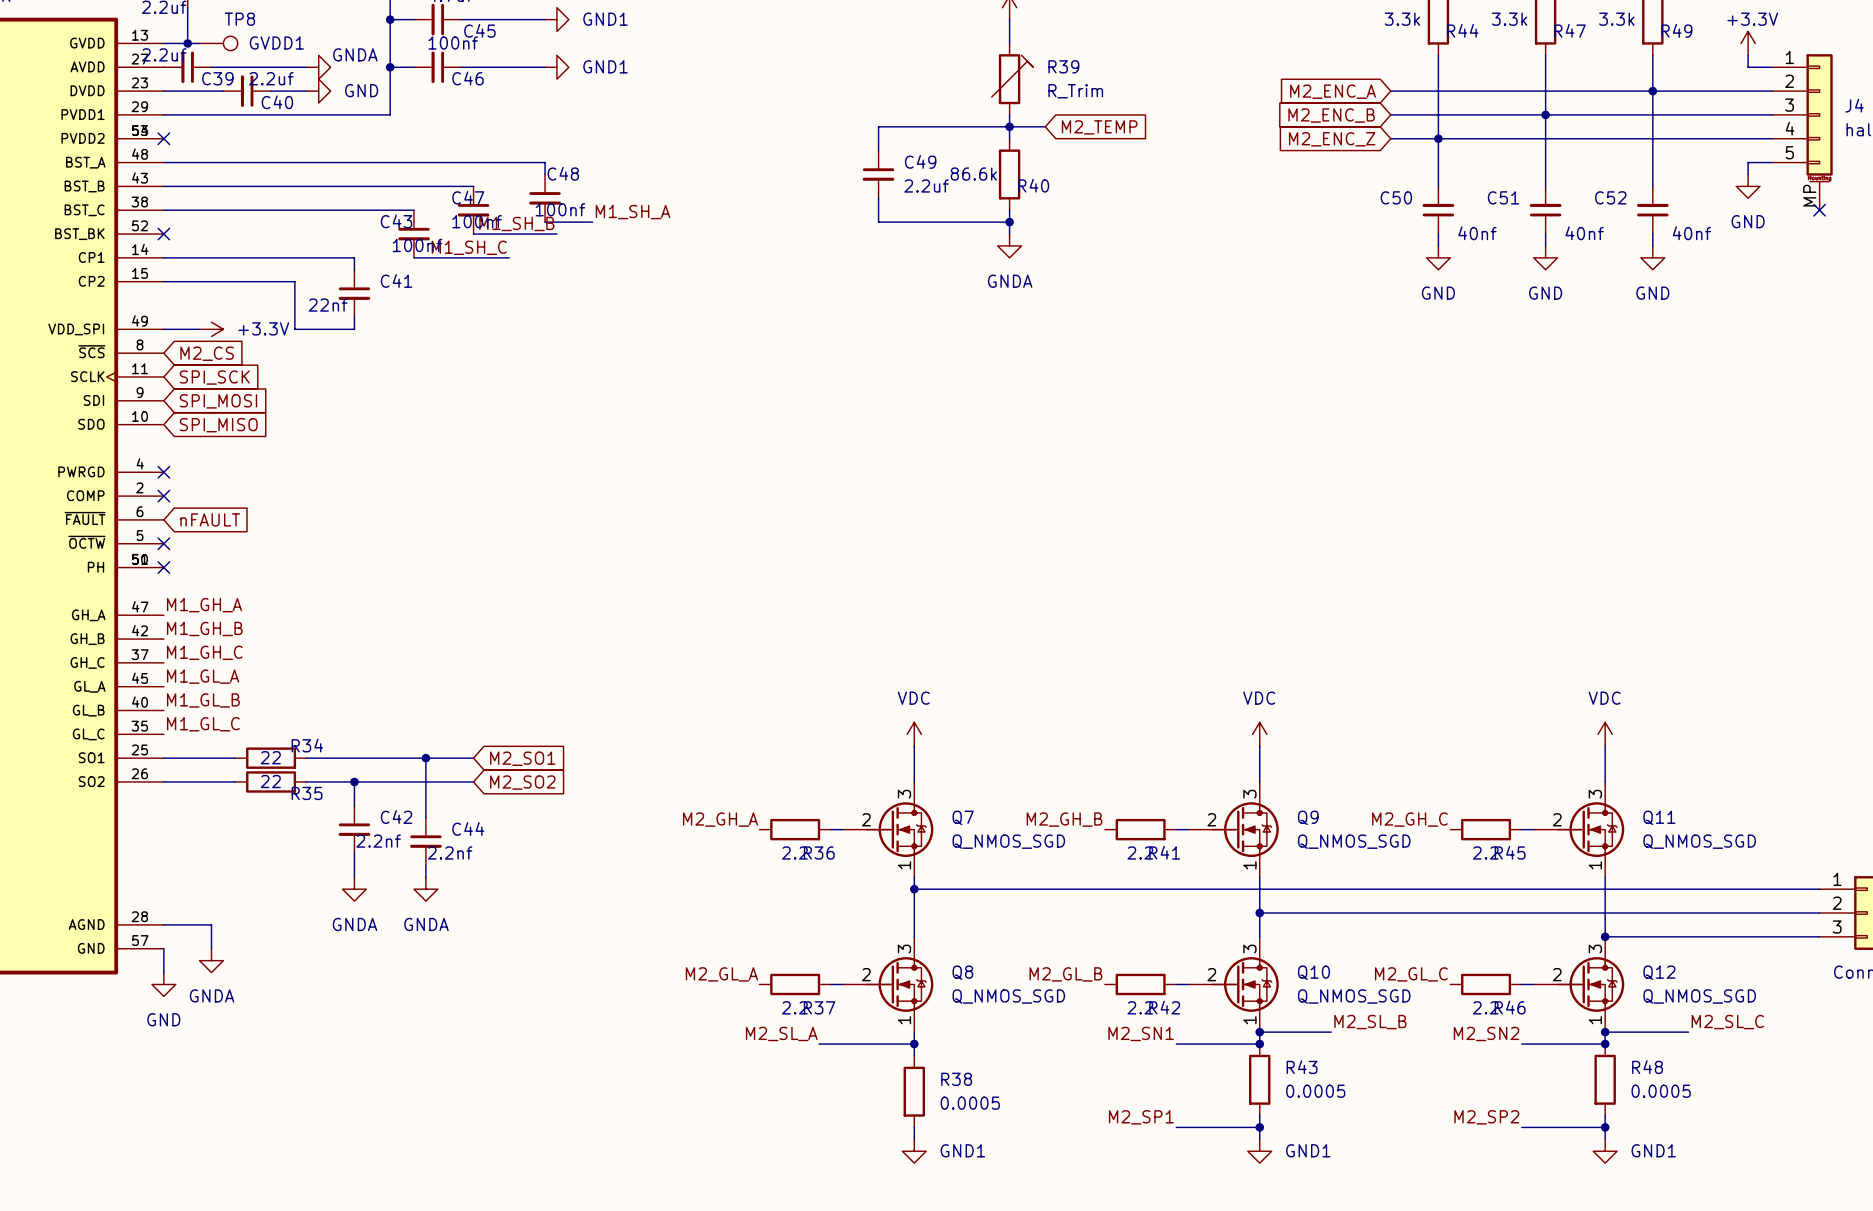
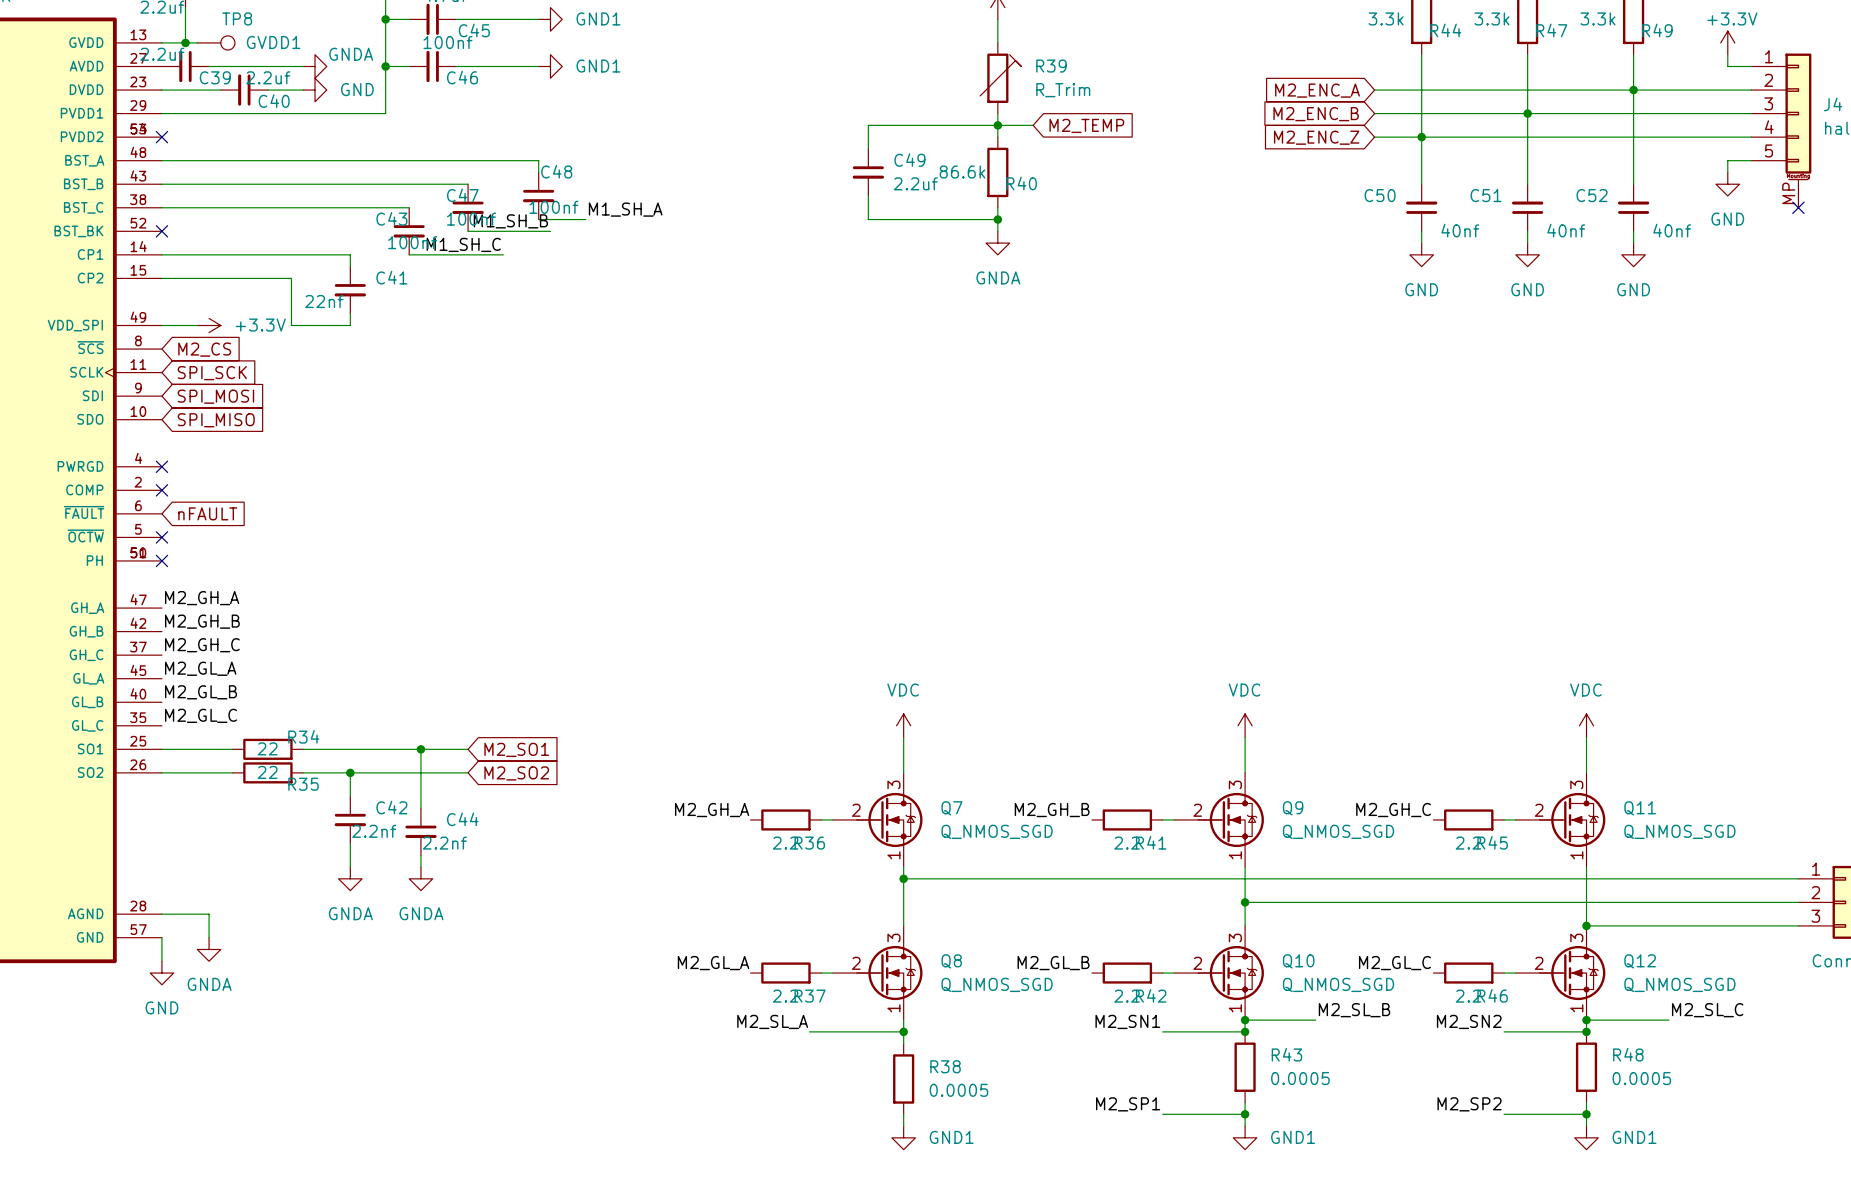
label: M1_GH_A (204, 605) -> M2_GH_A (202, 598)
label: M1_GH_B (204, 628) -> M2_GH_B (202, 621)
label: M1_GH_C (204, 652) -> M2_GH_C (202, 645)
label: M1_GL_A (203, 676) -> M2_GL_A (200, 668)
label: M1_GL_B (203, 700) -> M2_GL_B (201, 692)
label: M1_GL_C (203, 724) -> M2_GL_C (201, 715)

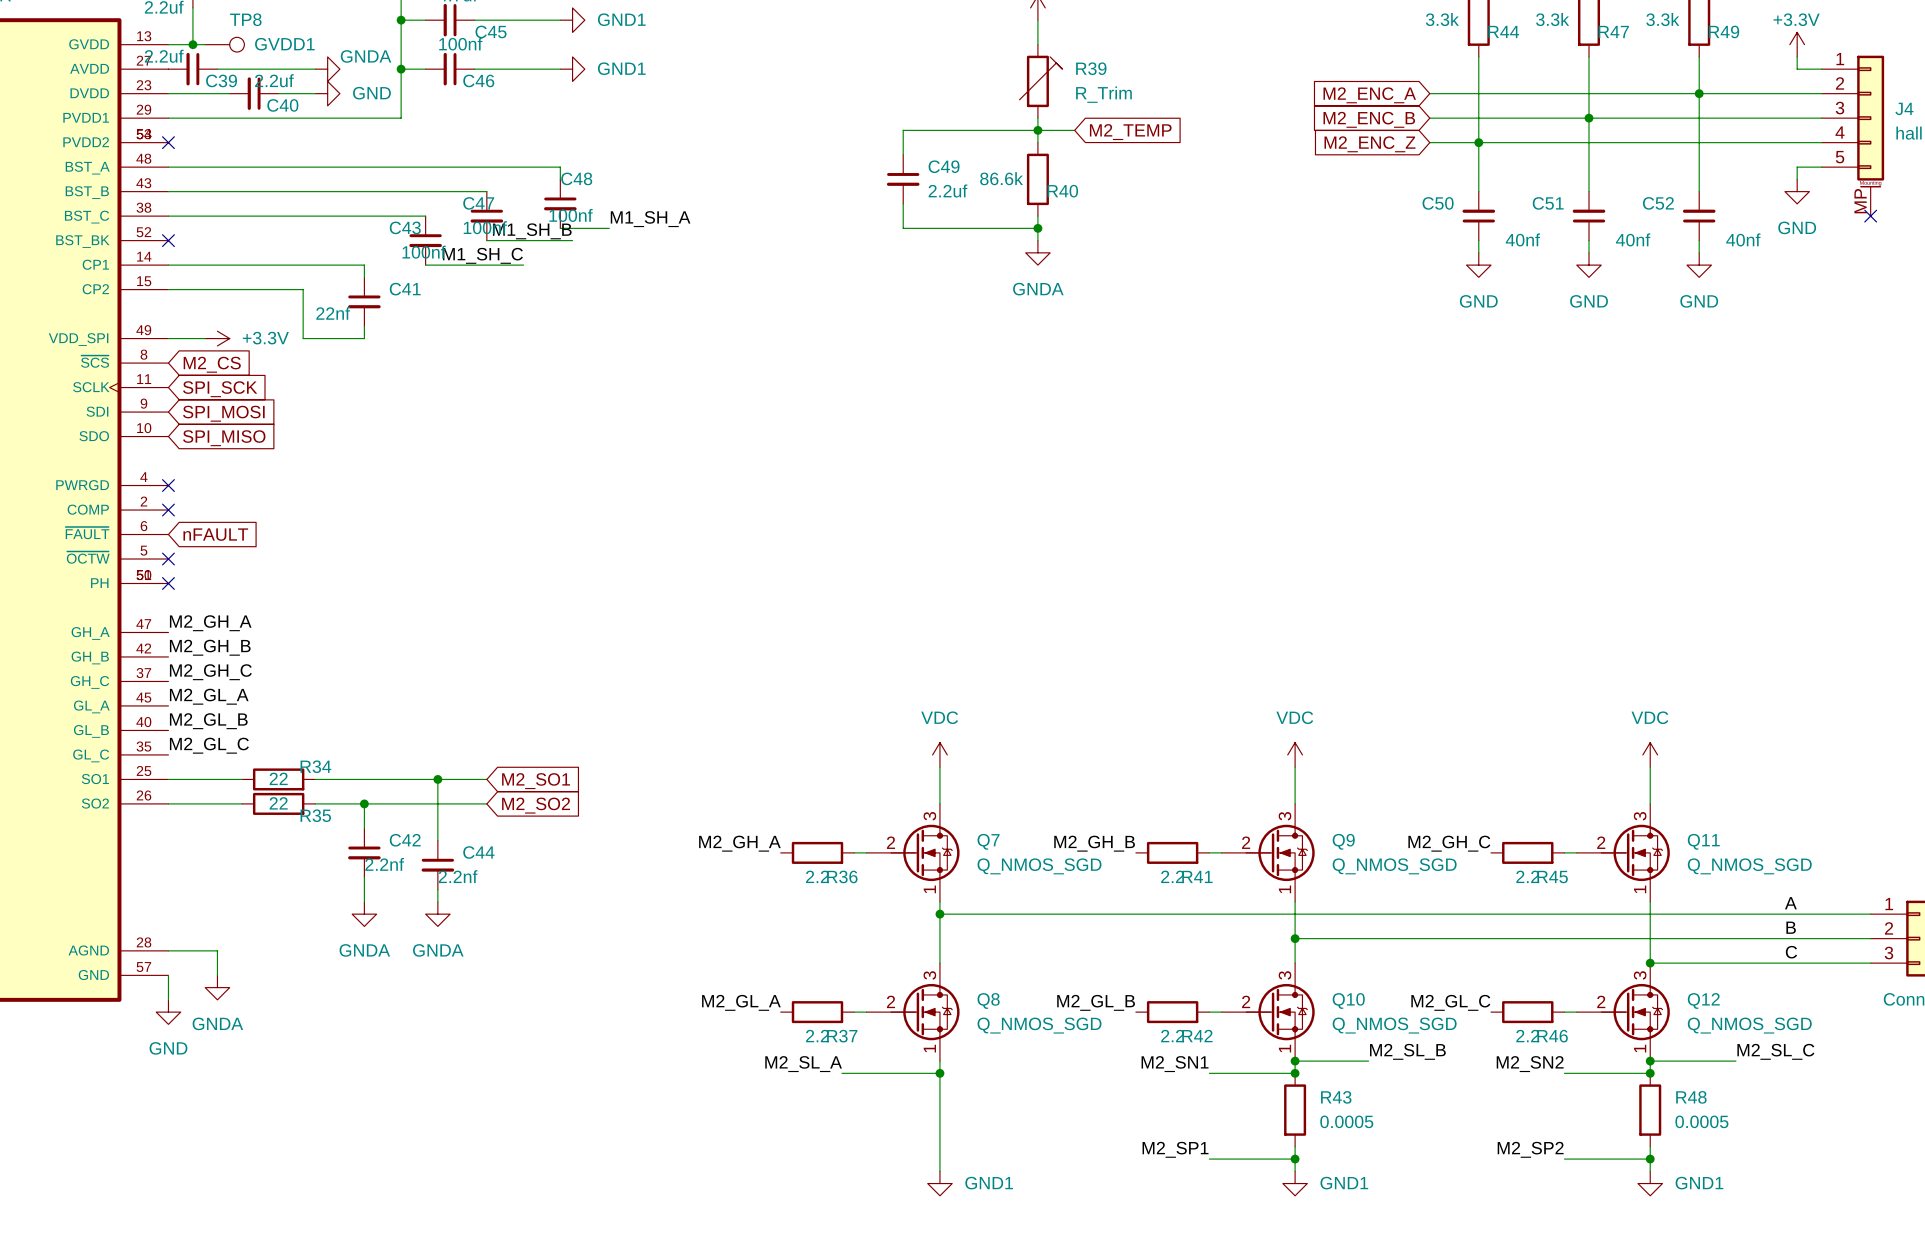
label: none -> A (1790, 903)
label: none -> B (1791, 927)
label: none -> C (1791, 952)
wire: none -> (939, 1085) (939, 1159)
R38: 0.0005 (903, 1078) -> none

